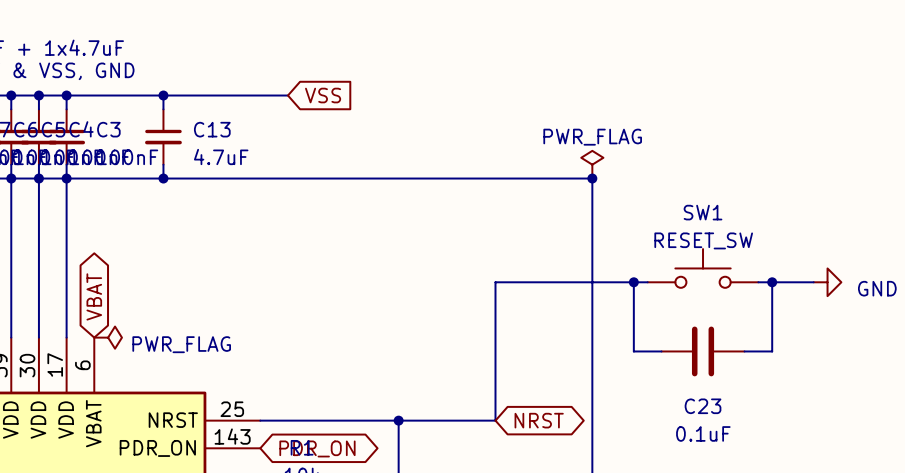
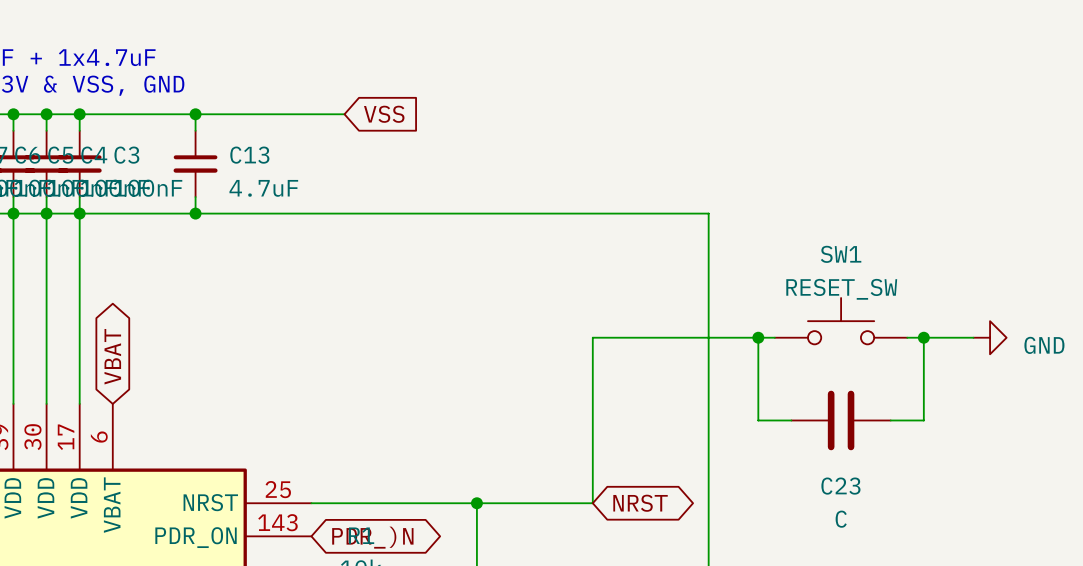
power symbol: PWR_FLAG (592, 164) -> none
junction: (592, 178) -> none
power symbol: PWR_FLAG (108, 337) -> none
C23 value: 0.1uF (703, 433) -> C (841, 519)
global label: PDR_ON (317, 448) -> PDR_)N (372, 537)

